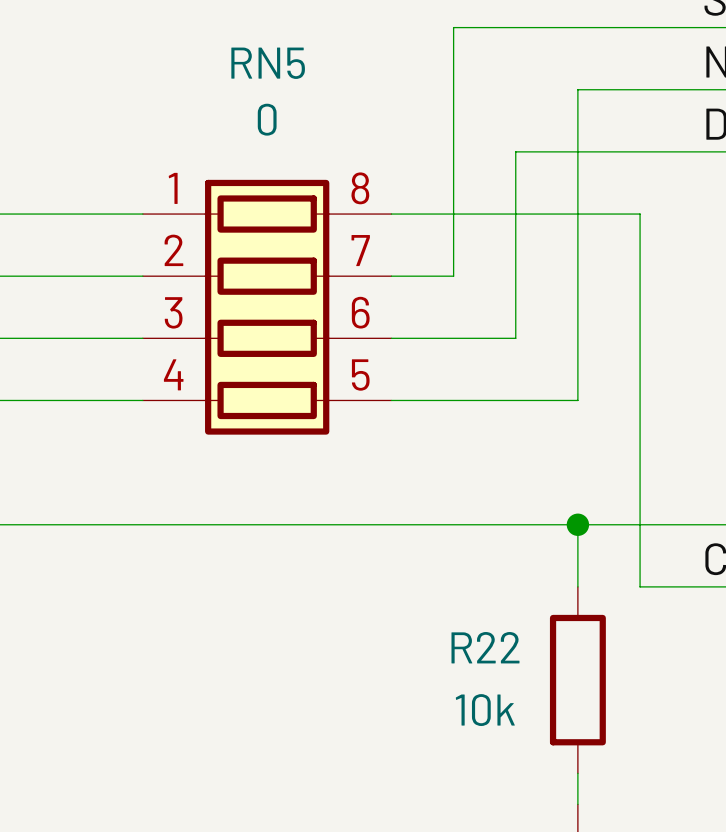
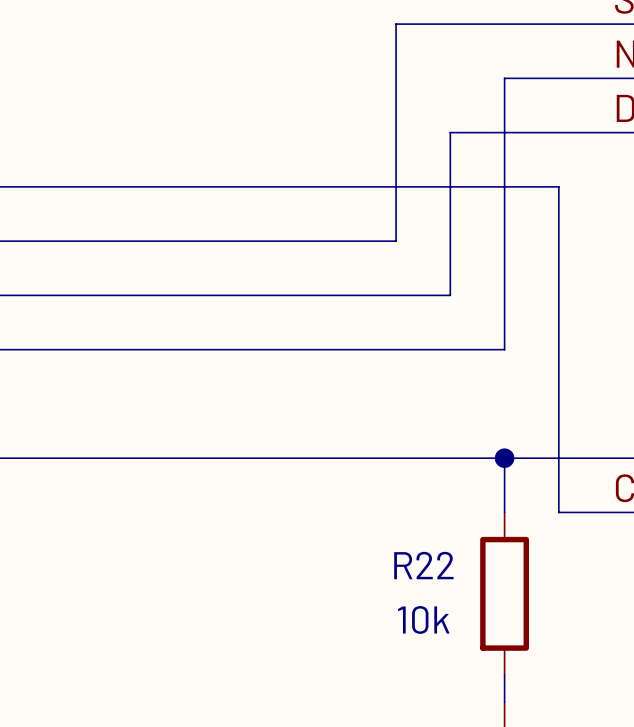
RN5: 0 (267, 307) -> none

